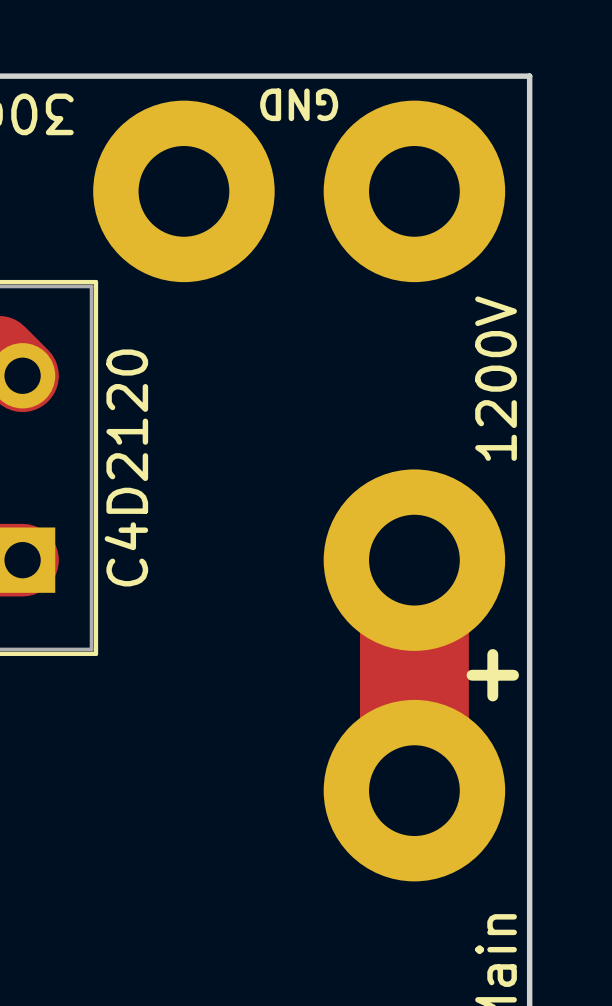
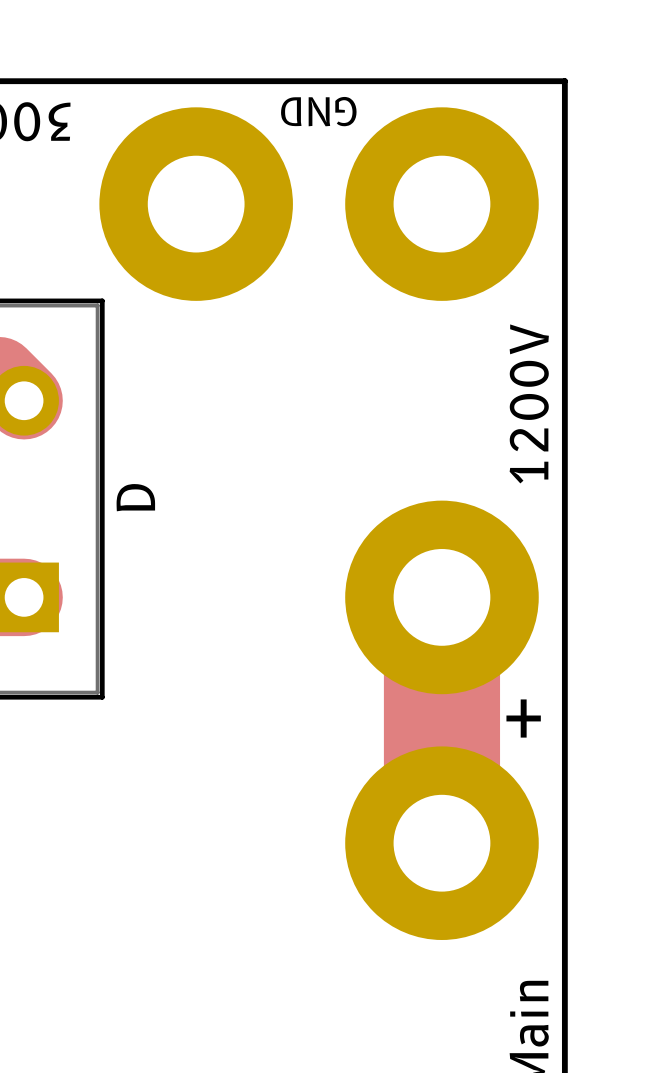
part value: C4D2120 (126, 467) -> D (135, 497)

